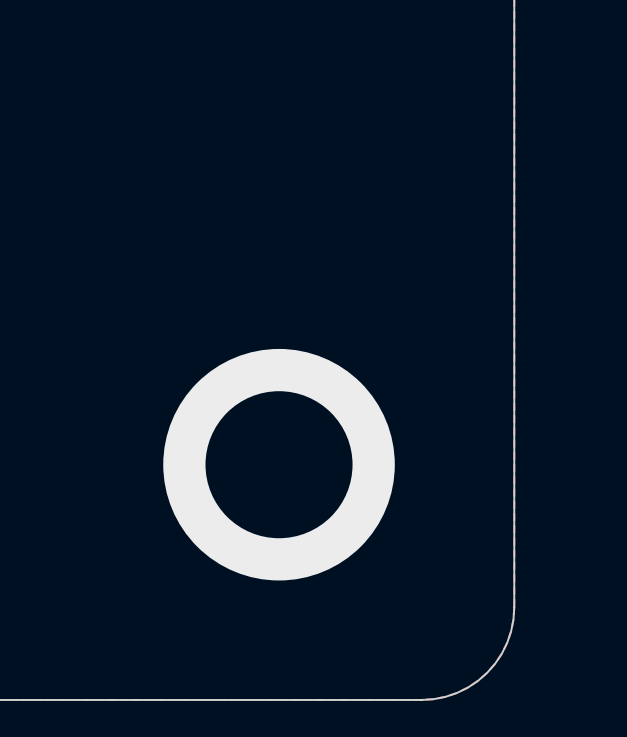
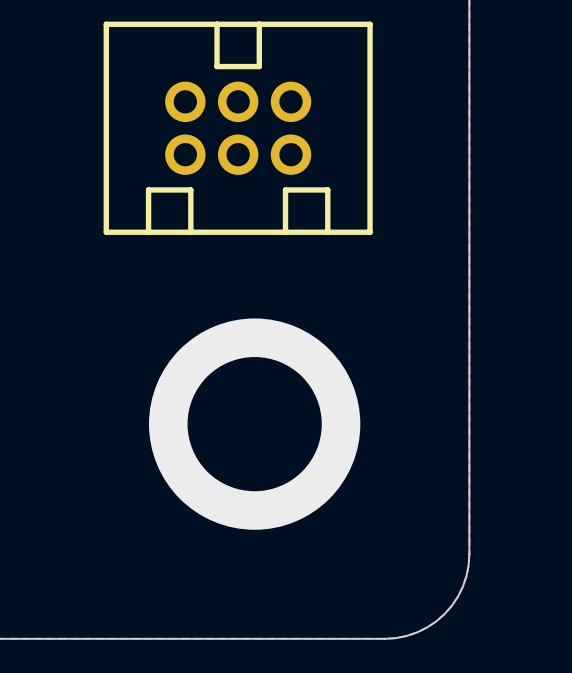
part: none -> (238, 128)

